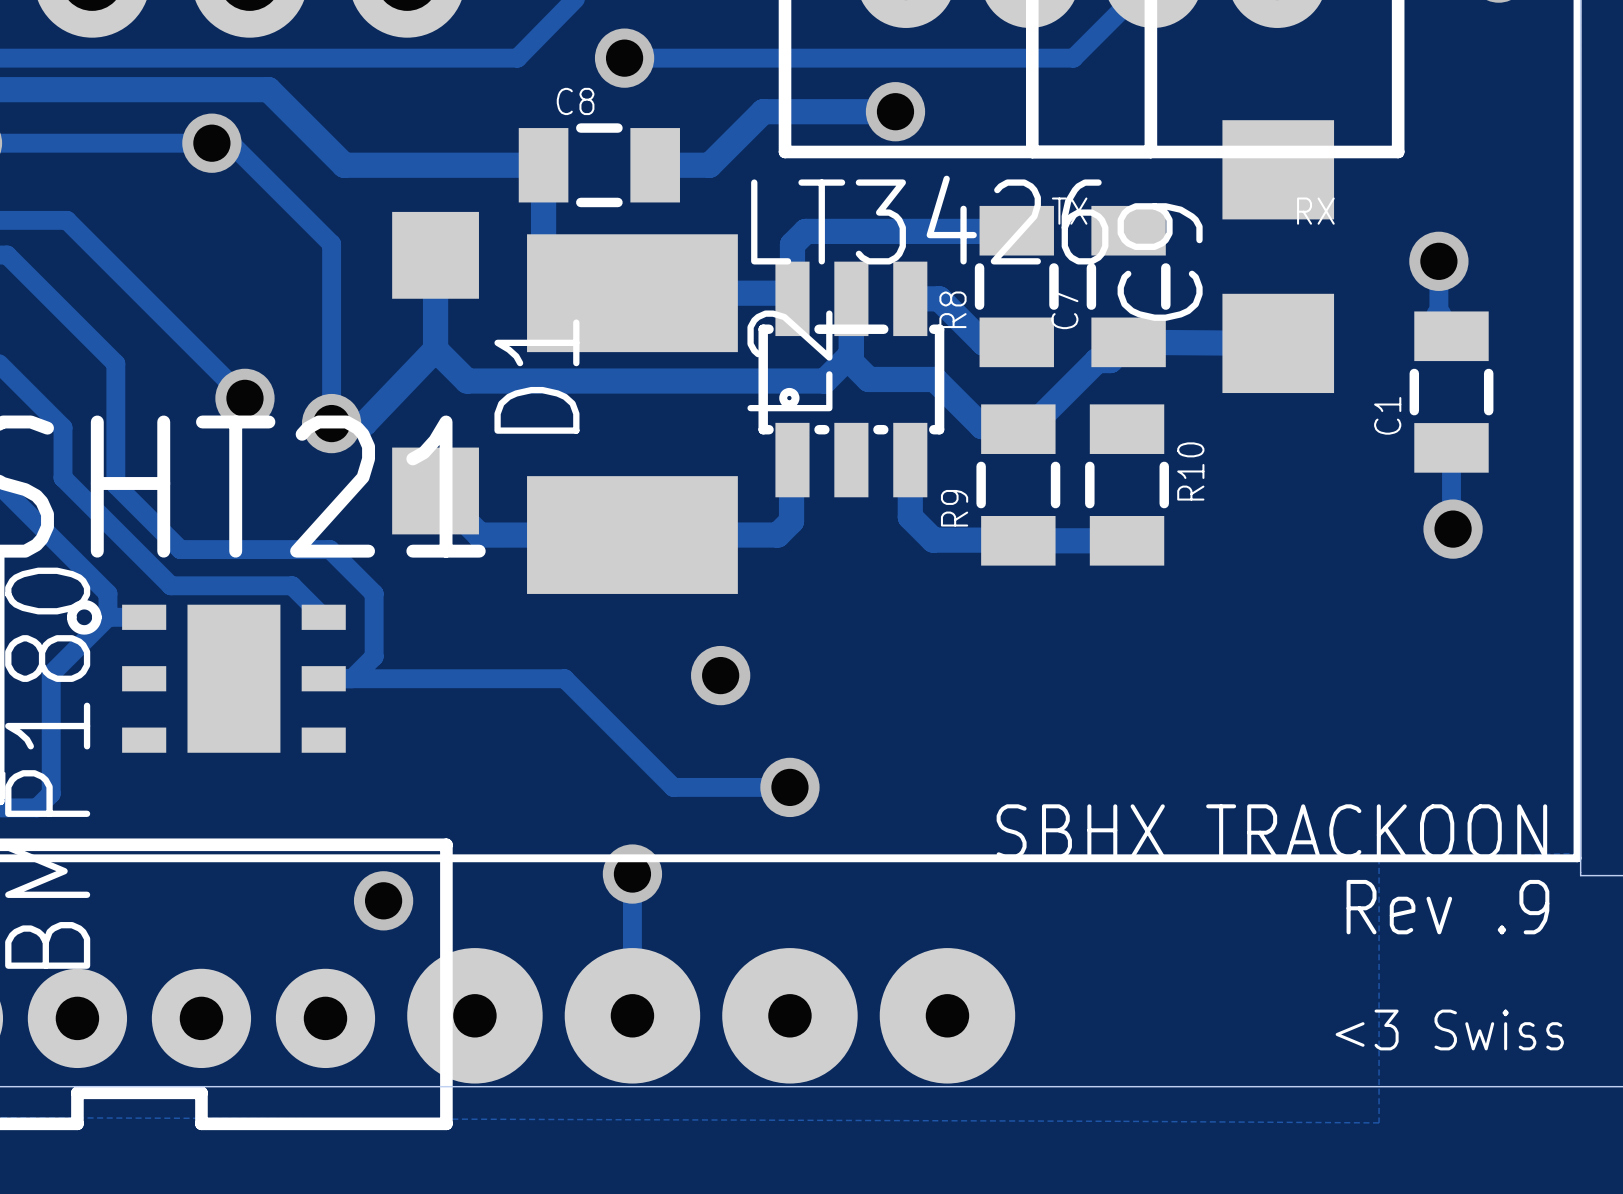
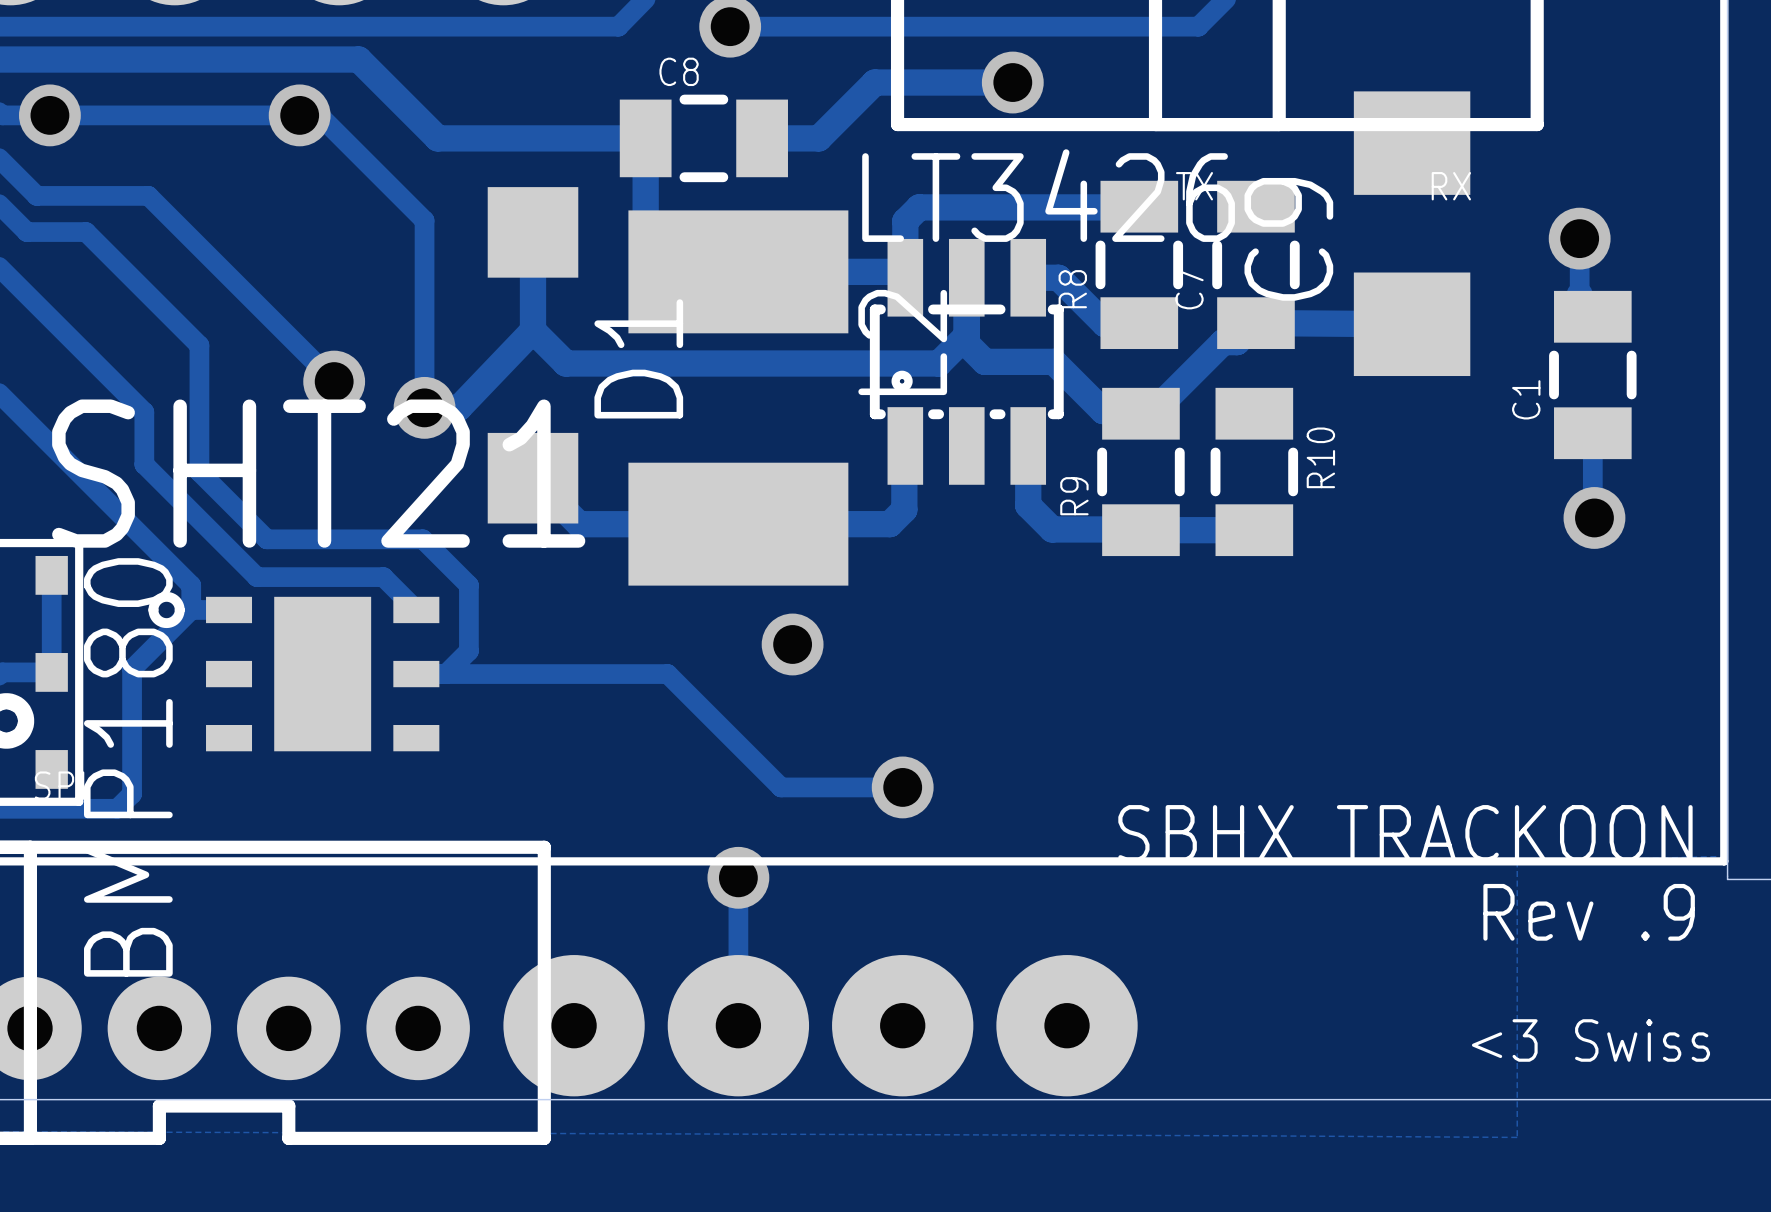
via position: (720, 675) -> (792, 644)
via: (383, 900) -> none

